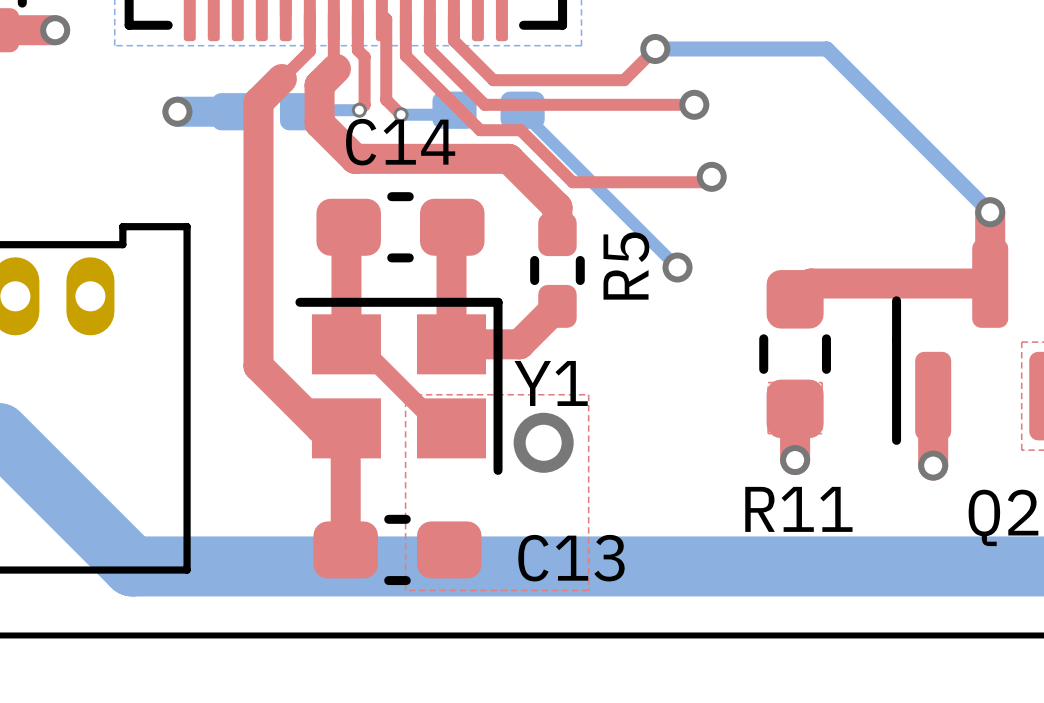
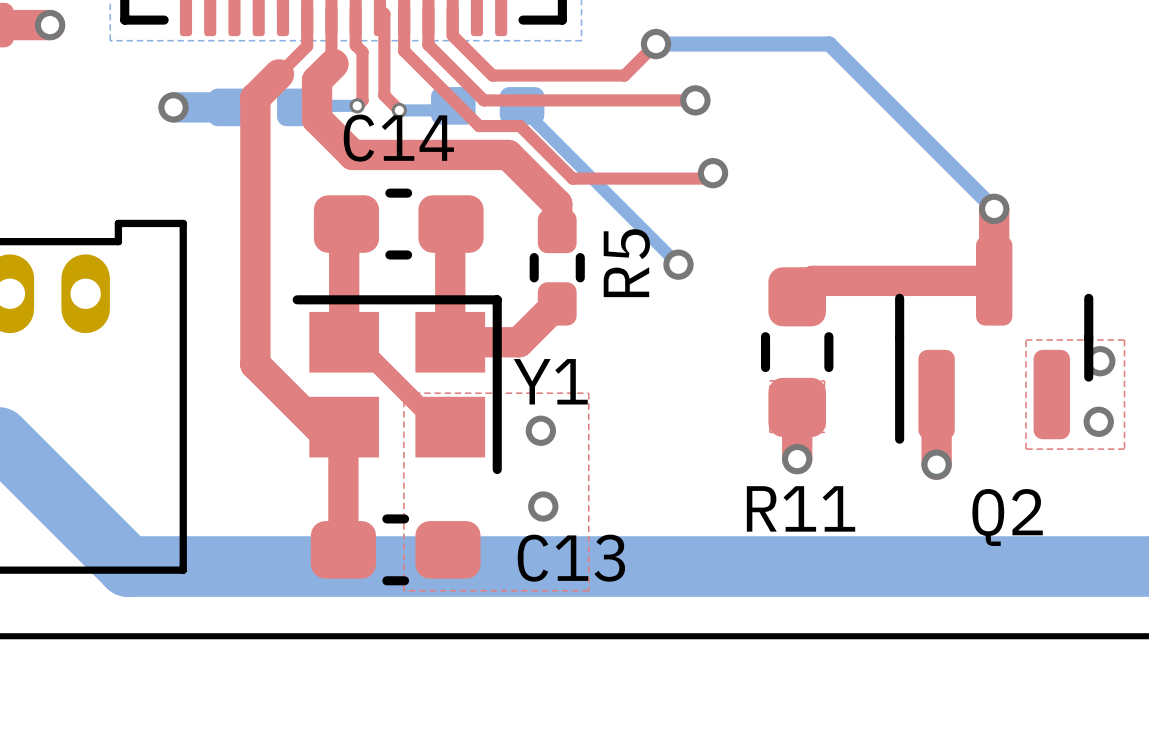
via size: [513, 412, 574, 473] -> [525, 415, 557, 446]
via: none -> (543, 506)

